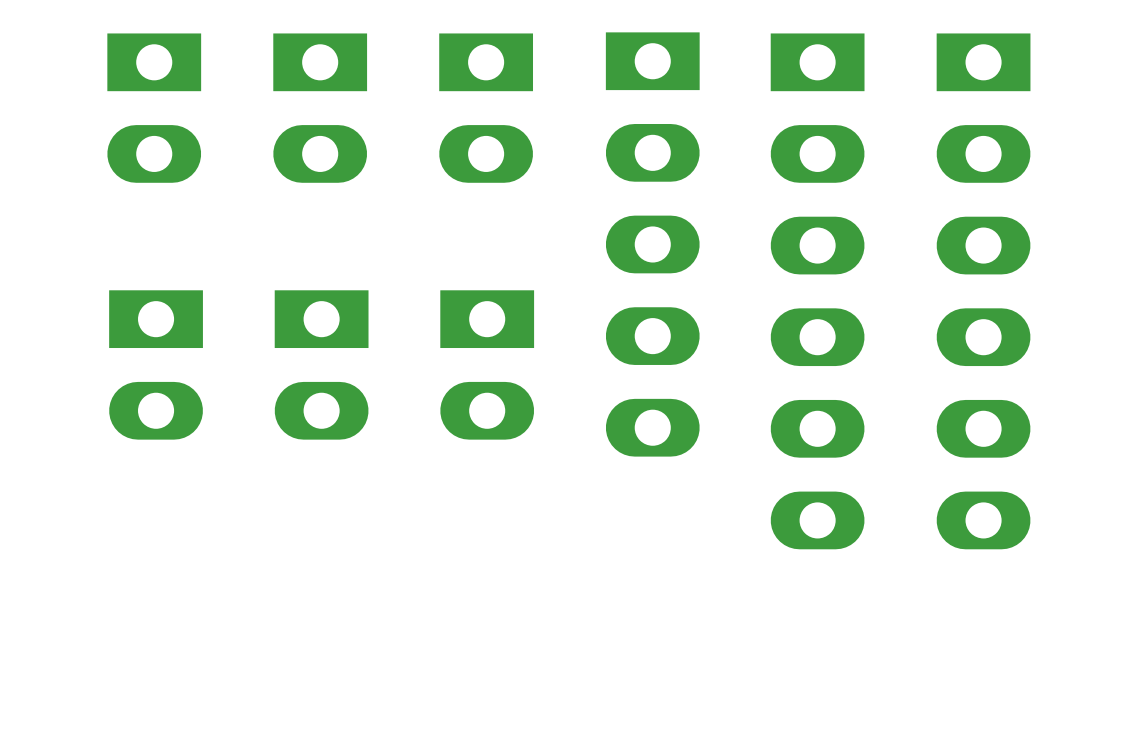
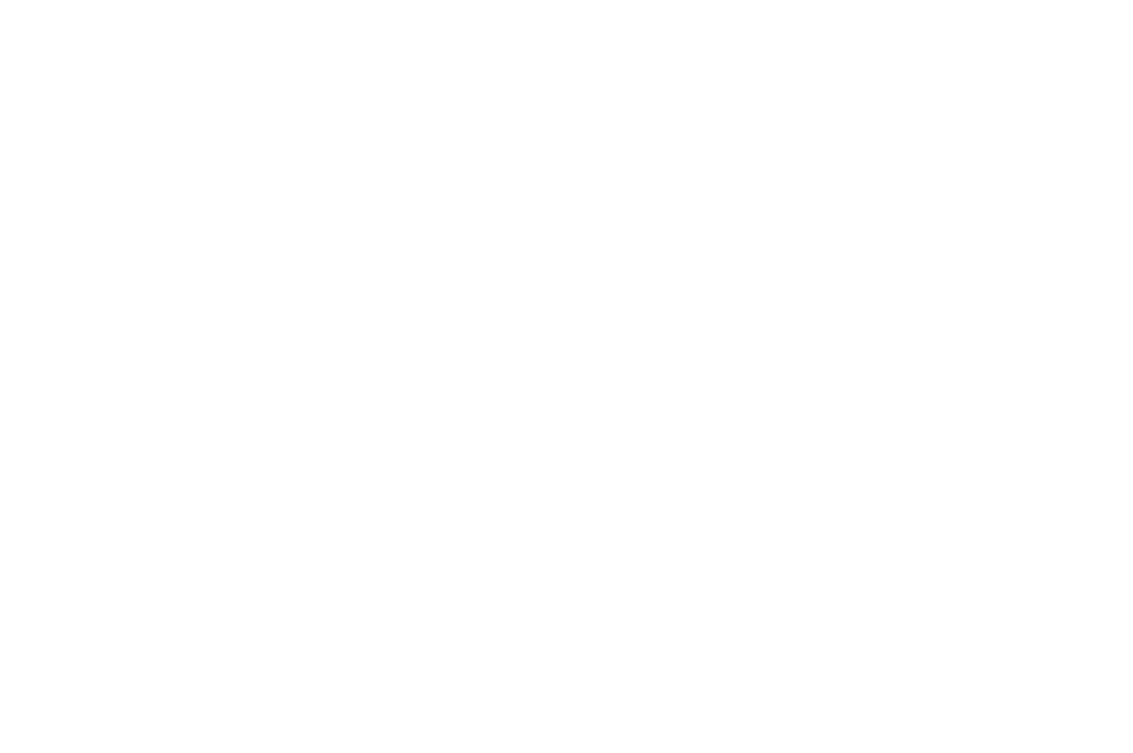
part: (154, 108) -> none
part: (320, 108) -> none
part: (486, 108) -> none
part: (652, 244) -> none
part: (817, 291) -> none
part: (983, 291) -> none
part: (156, 364) -> none
part: (321, 364) -> none
part: (487, 364) -> none

